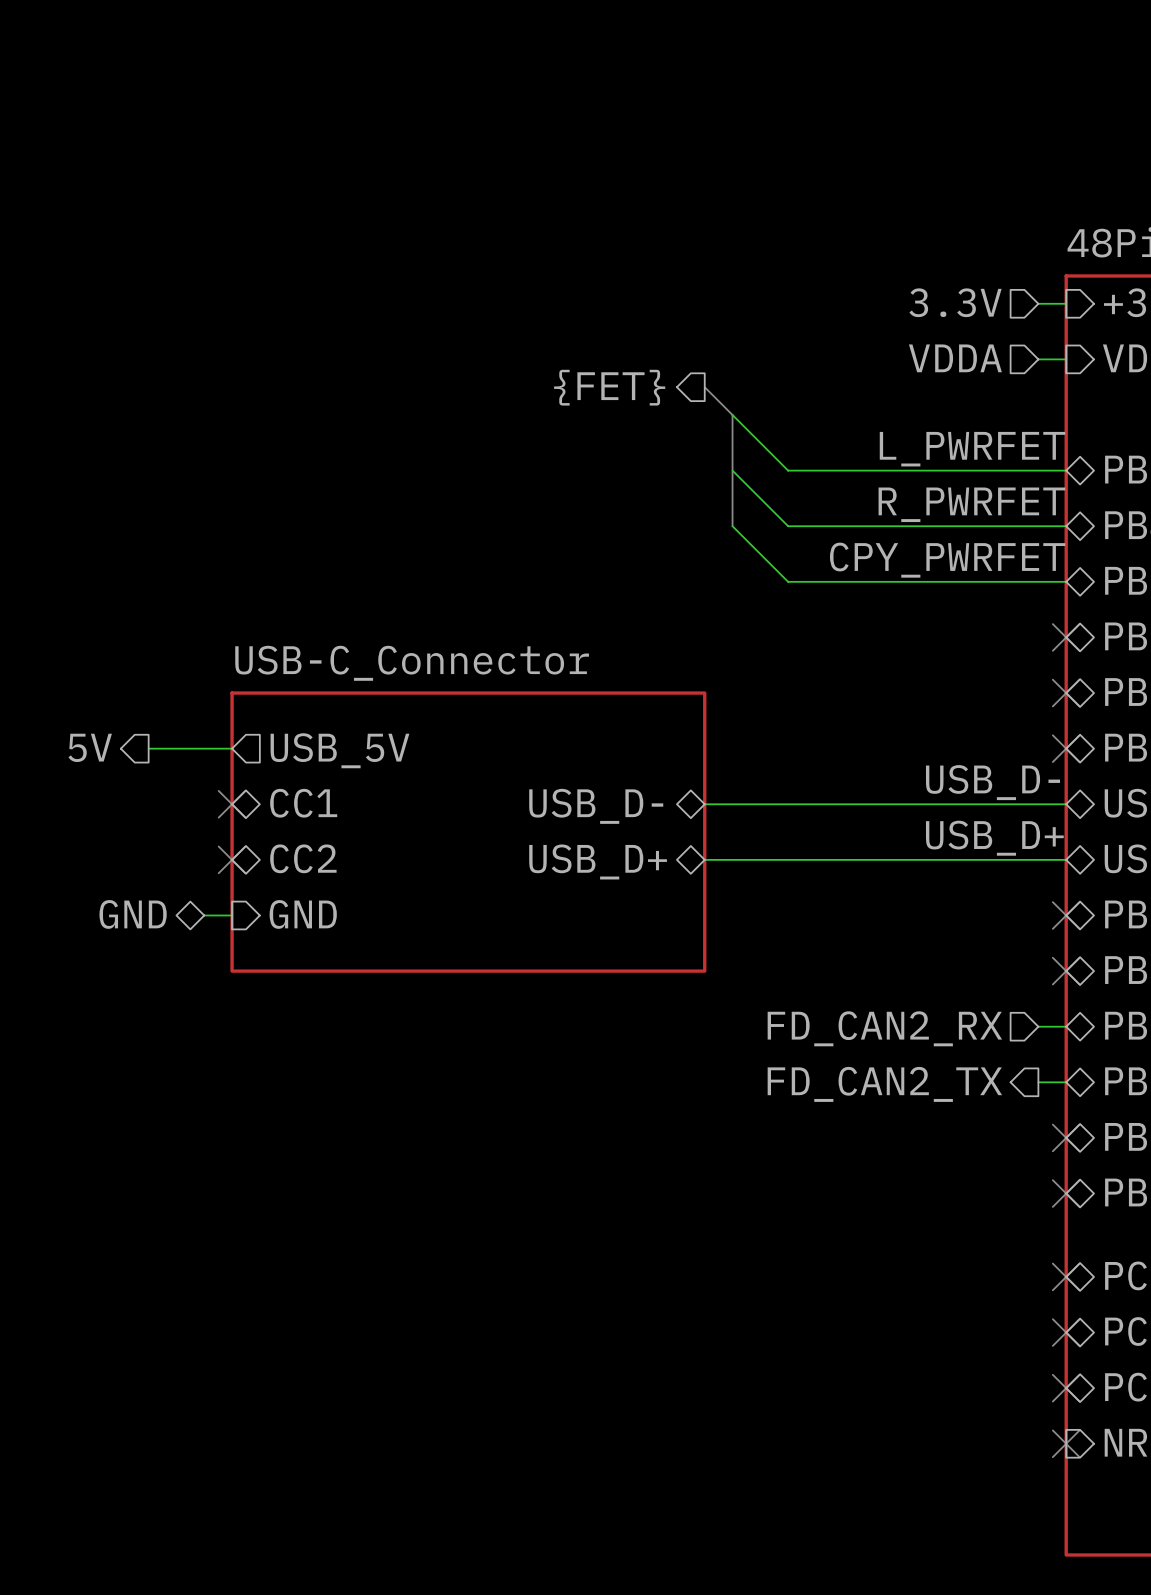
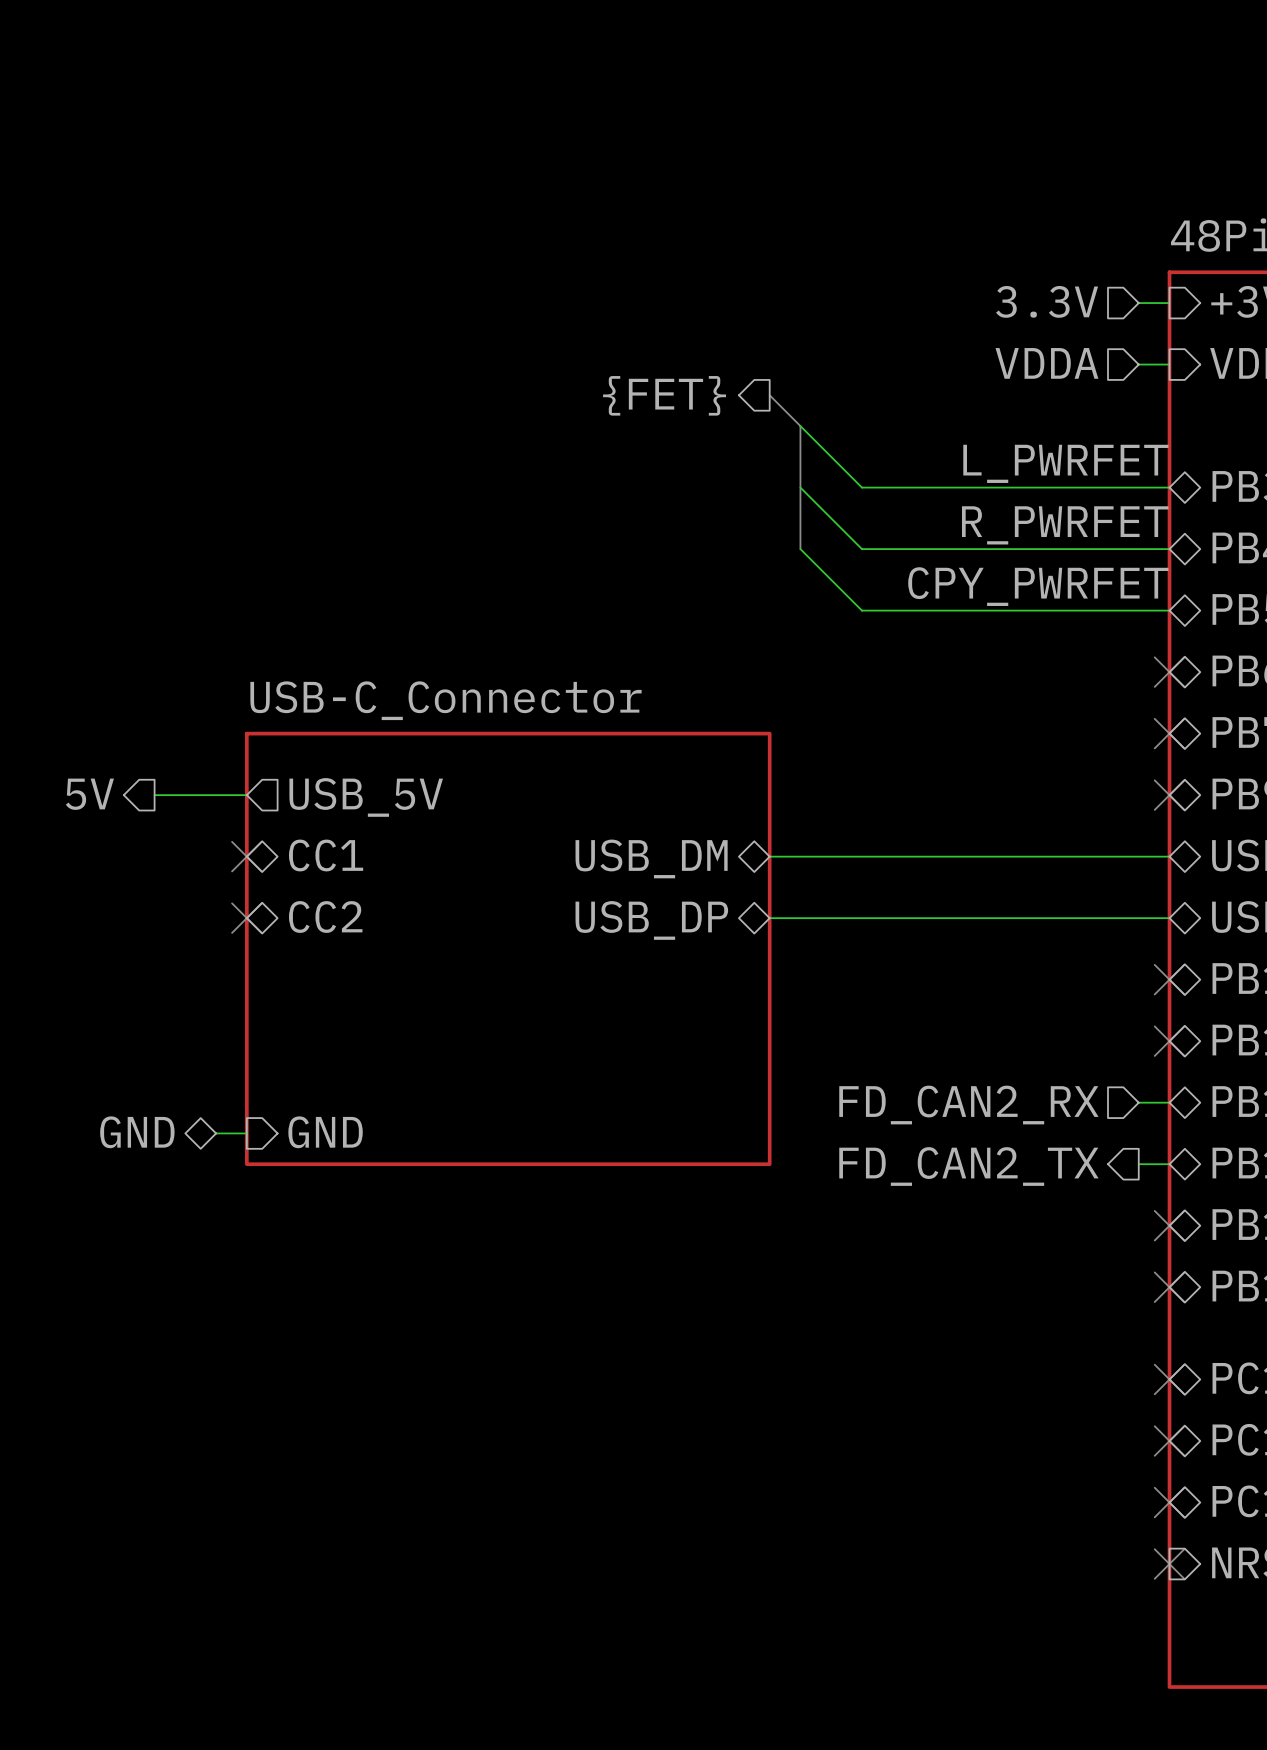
label: USB_D- (993, 782) -> none
sheet pin: USB_D- (596, 806) -> USB_DM (651, 858)
sheet USB-C_Connector: (468, 832) -> none
label: USB_D+ (994, 838) -> none
sheet pin: USB_D+ (598, 861) -> USB_DP (651, 920)
sheet USB-C_Connector: none -> (508, 948)
hierarchical label position: GND (133, 914) -> GND (137, 1132)
sheet pin position: GND (303, 914) -> GND (325, 1132)
wire: (204, 915) (232, 915) -> (216, 1133) (246, 1133)

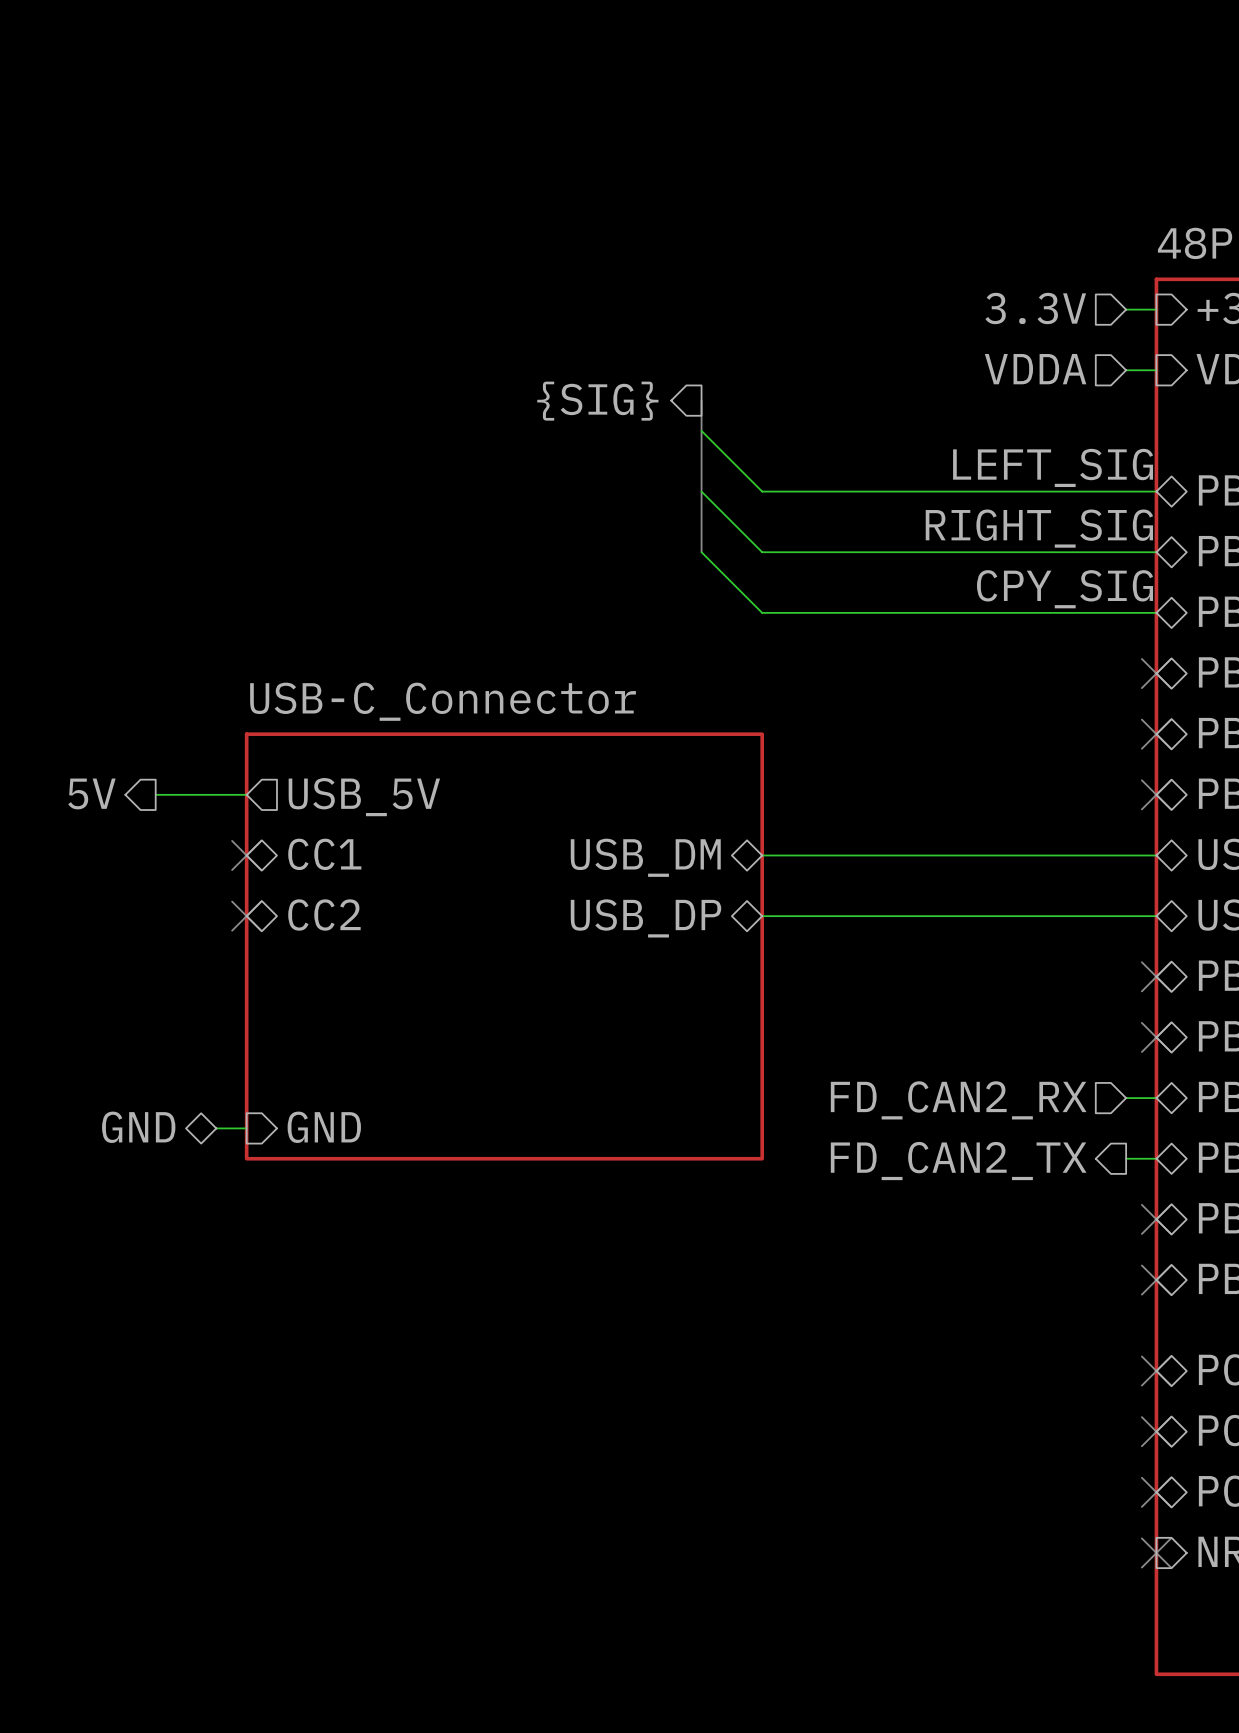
hierarchical label: none -> {SIG} (597, 401)
hierarchical label: {FET} (664, 395) -> none
bus: none -> (701, 400) (701, 552)
bus: (769, 395) (800, 426) (800, 549) -> none
wire: (800, 426) (861, 487) -> (701, 430) (762, 491) (853, 491)
label: L_PWRFET (1065, 463) -> LEFT_SIG (1053, 467)
wire: (800, 487) (861, 549) -> (701, 491) (762, 552) (853, 552)
label: R_PWRFET (1065, 525) -> RIGHT_SIG (1039, 528)
wire: (800, 549) (861, 610) -> (701, 552) (762, 612) (853, 612)
label: CPY_PWRFET (1038, 586) -> CPY_SIG (1065, 589)

